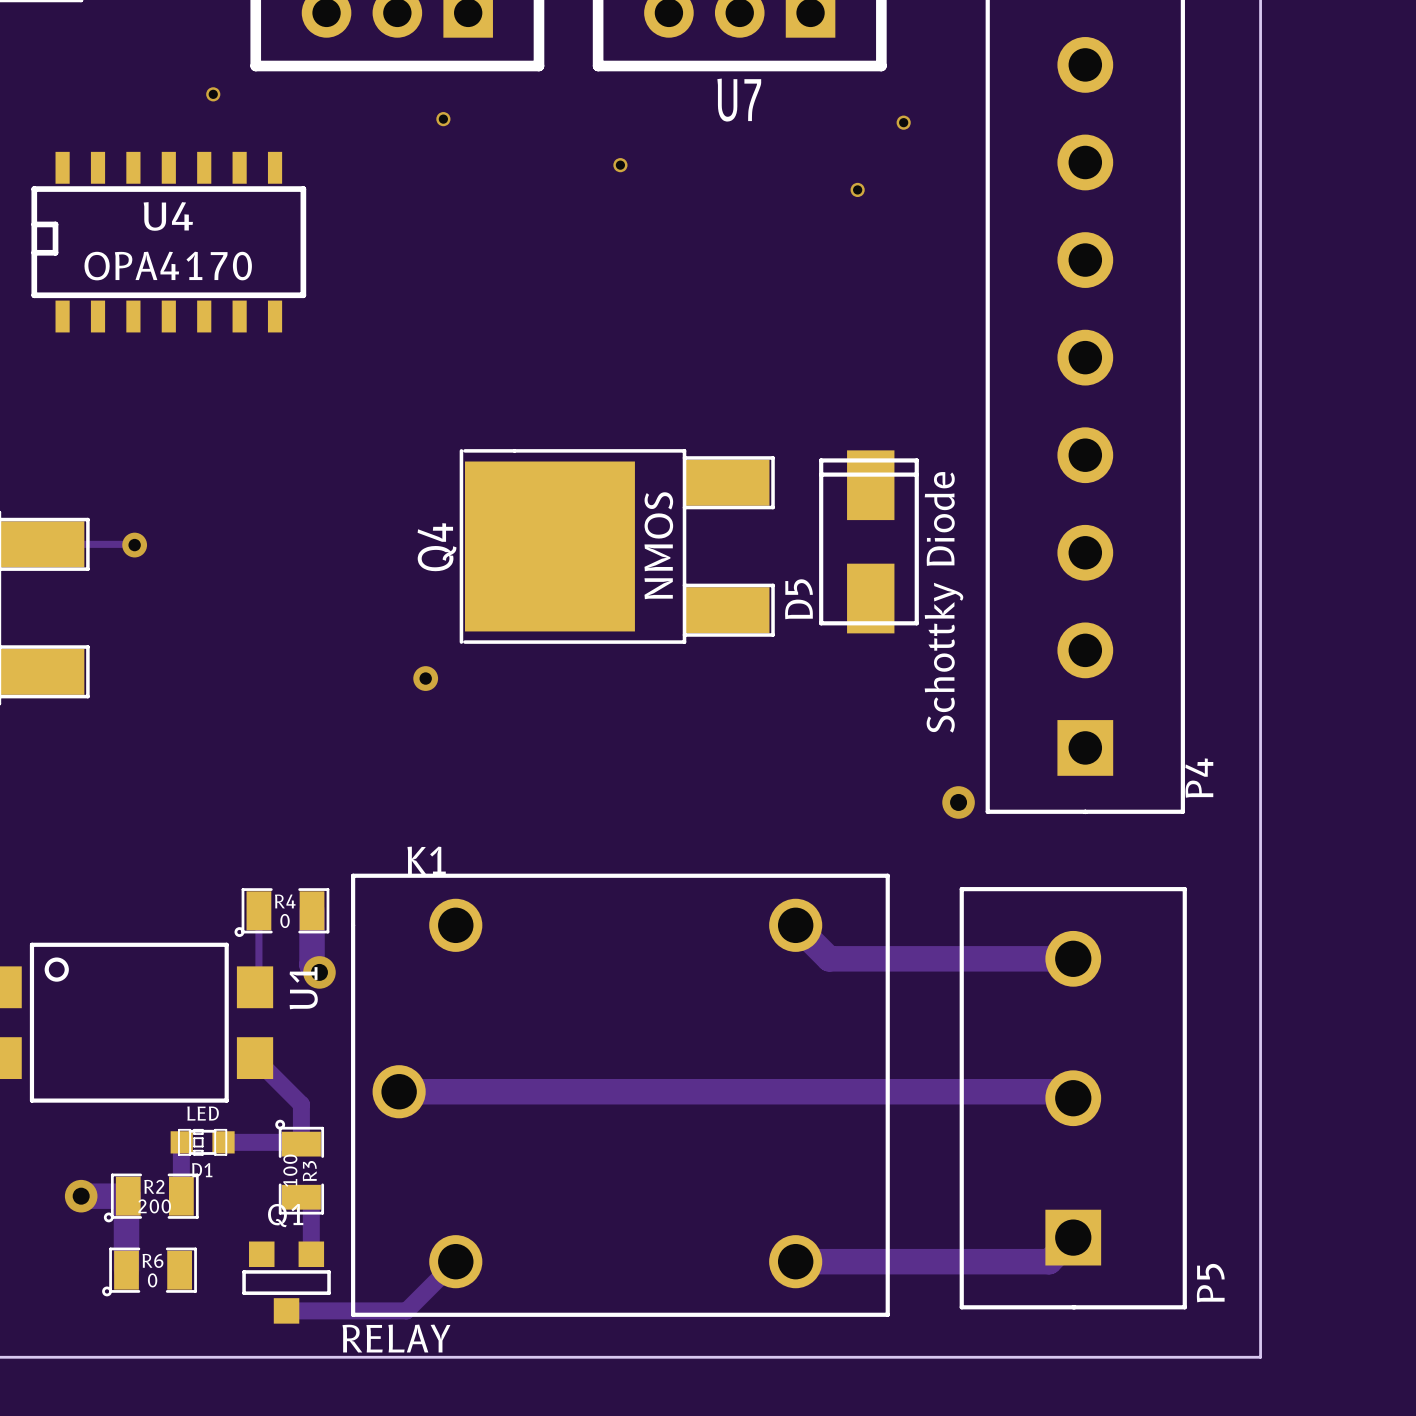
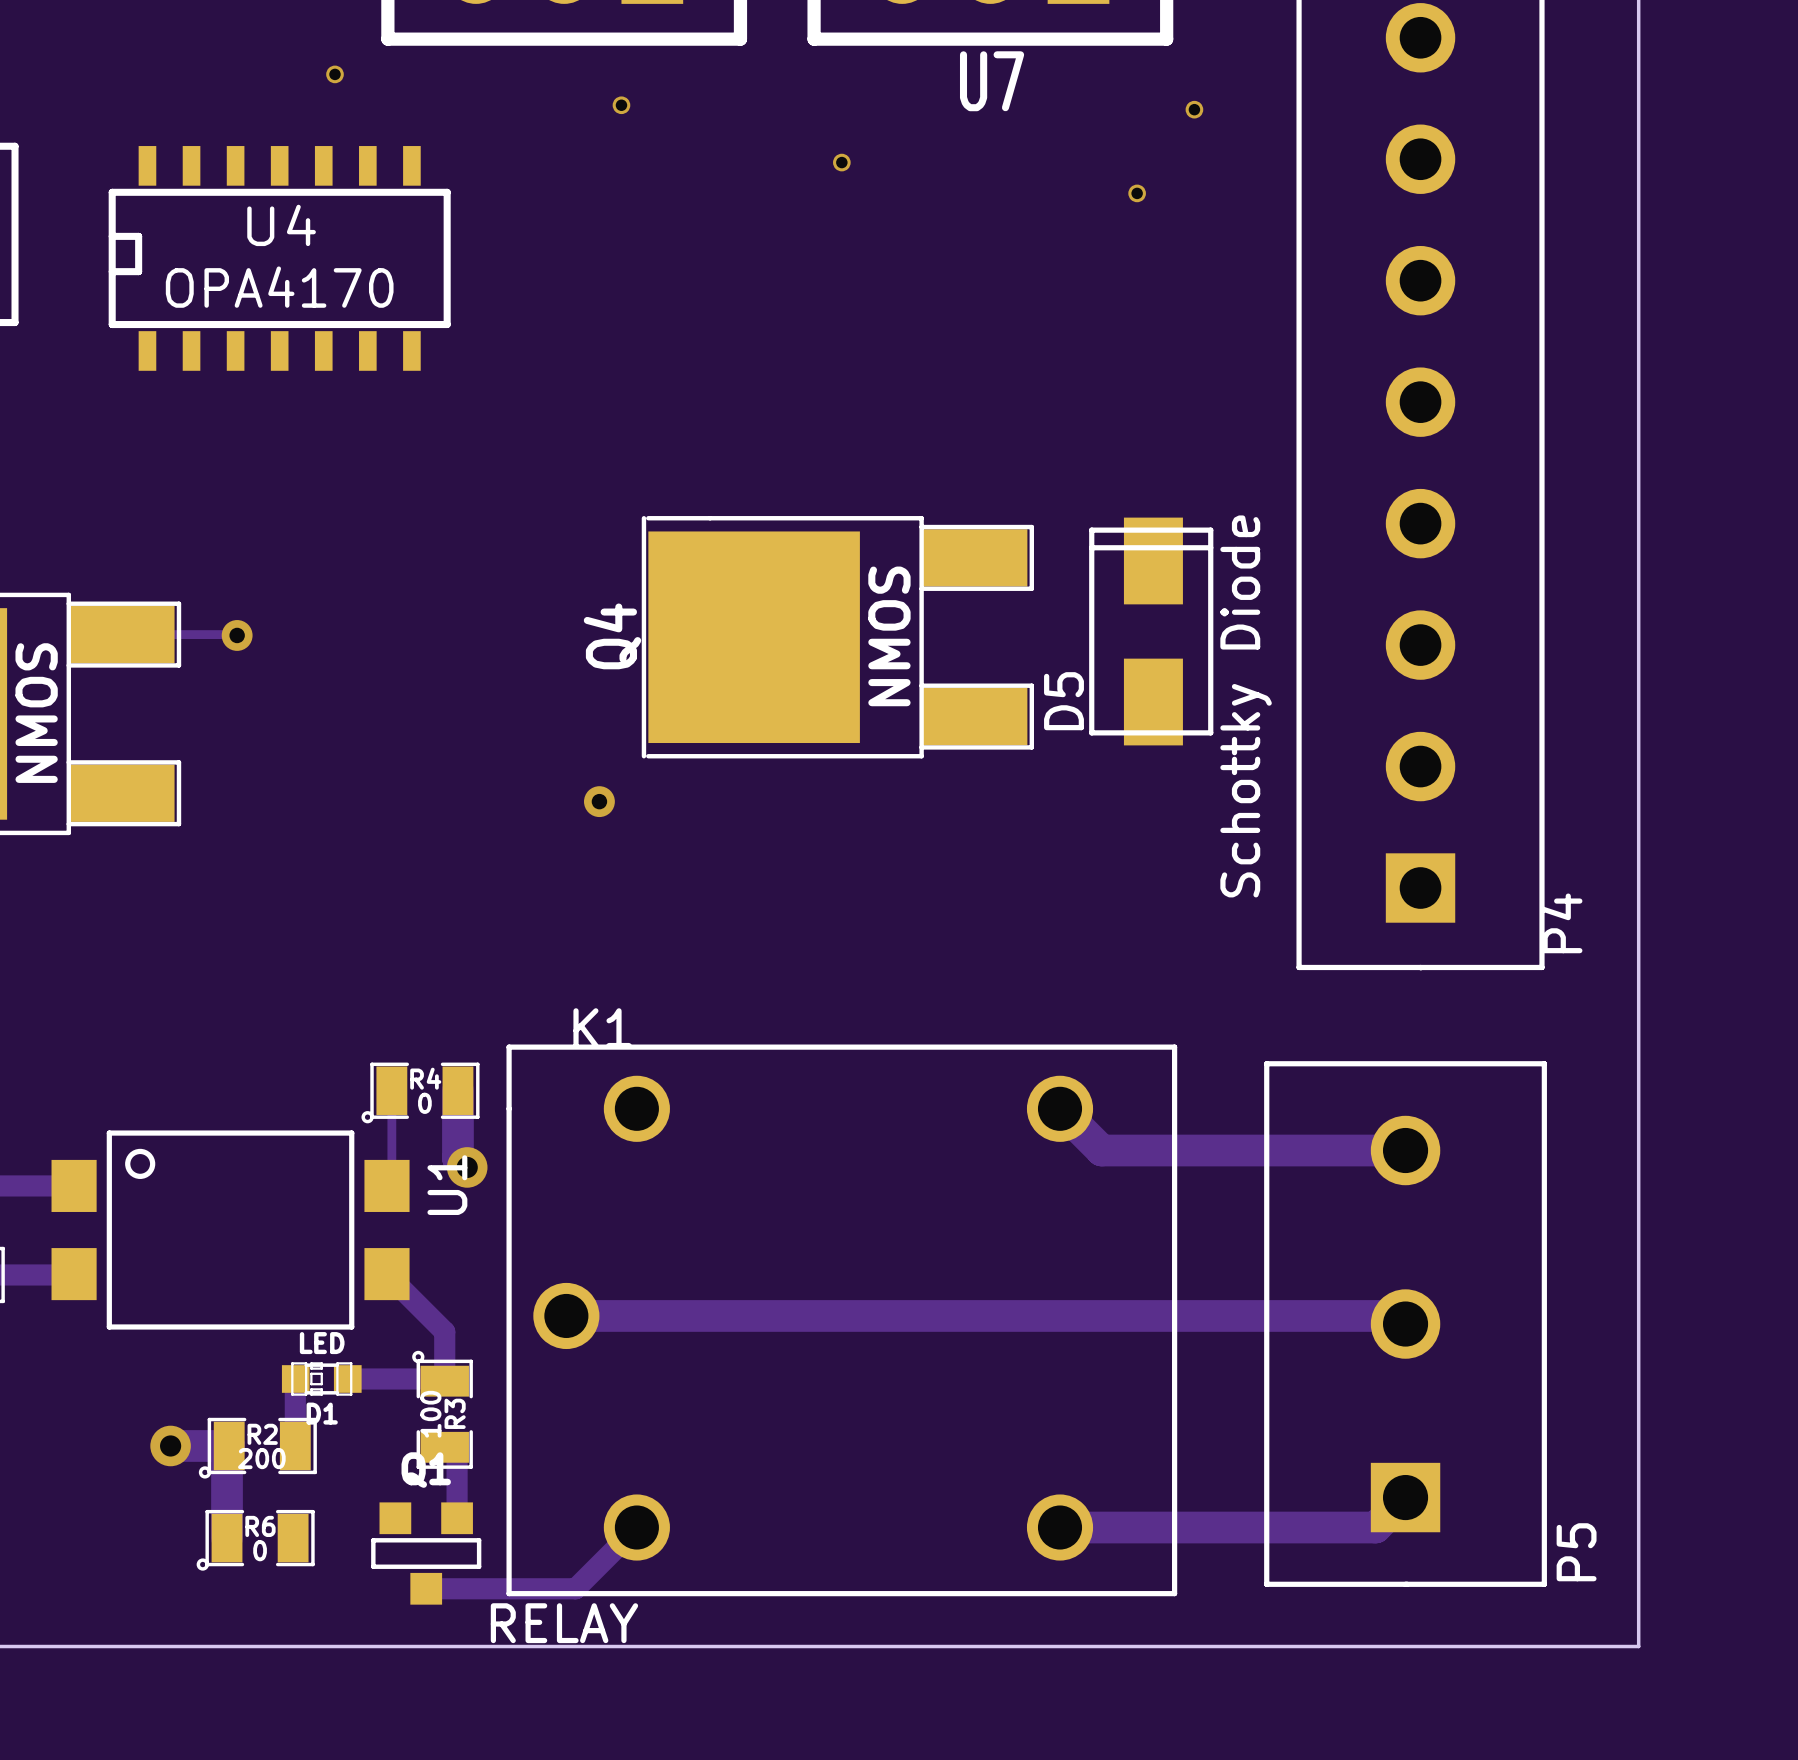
via: (958, 802) -> none

